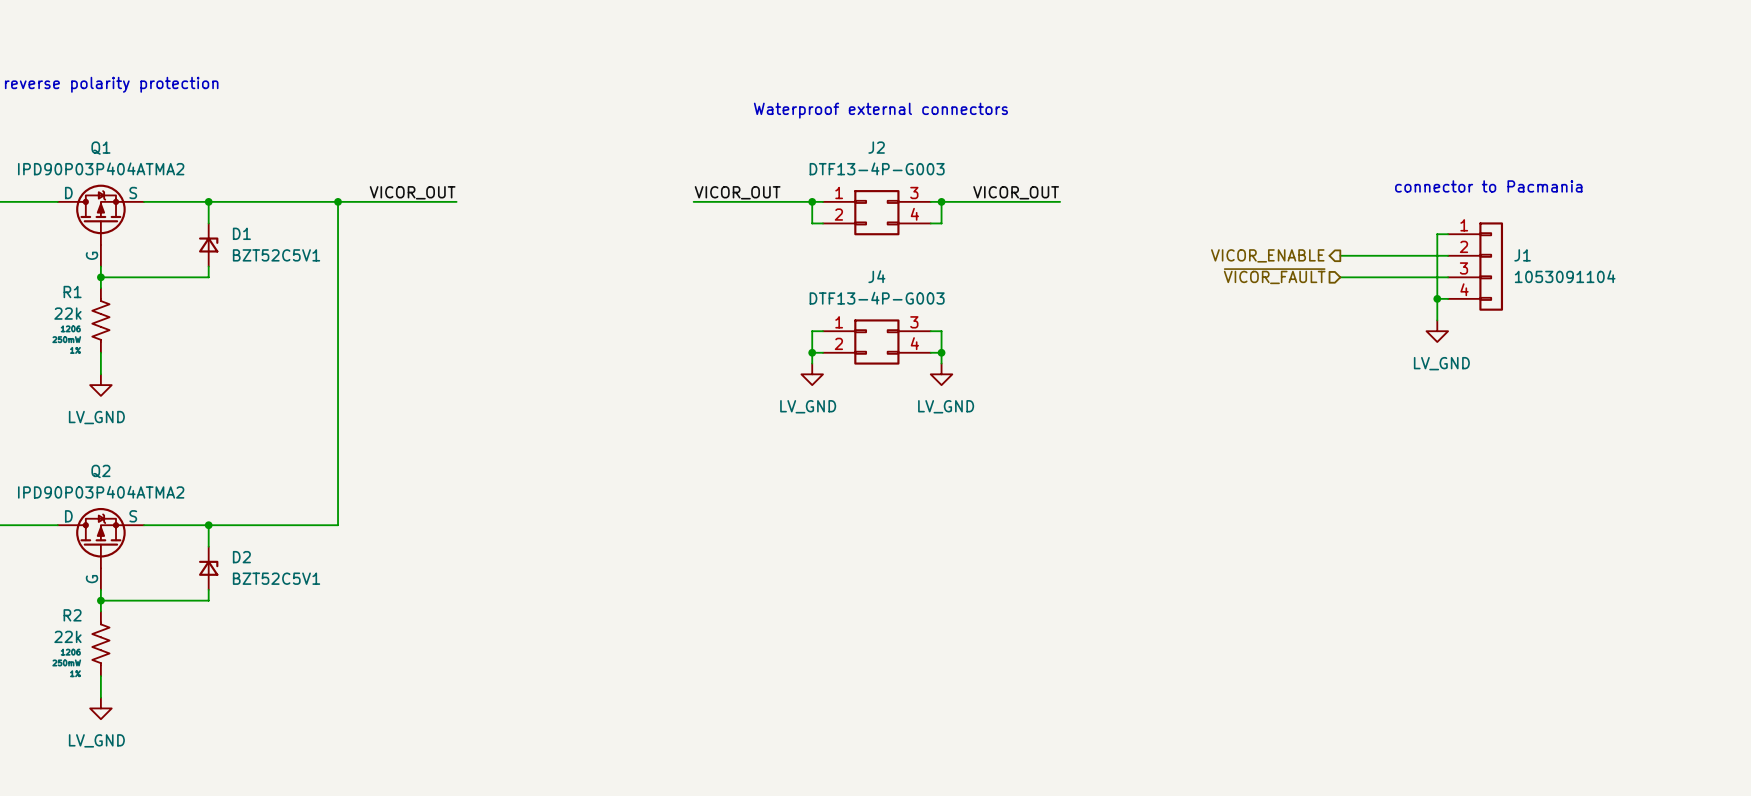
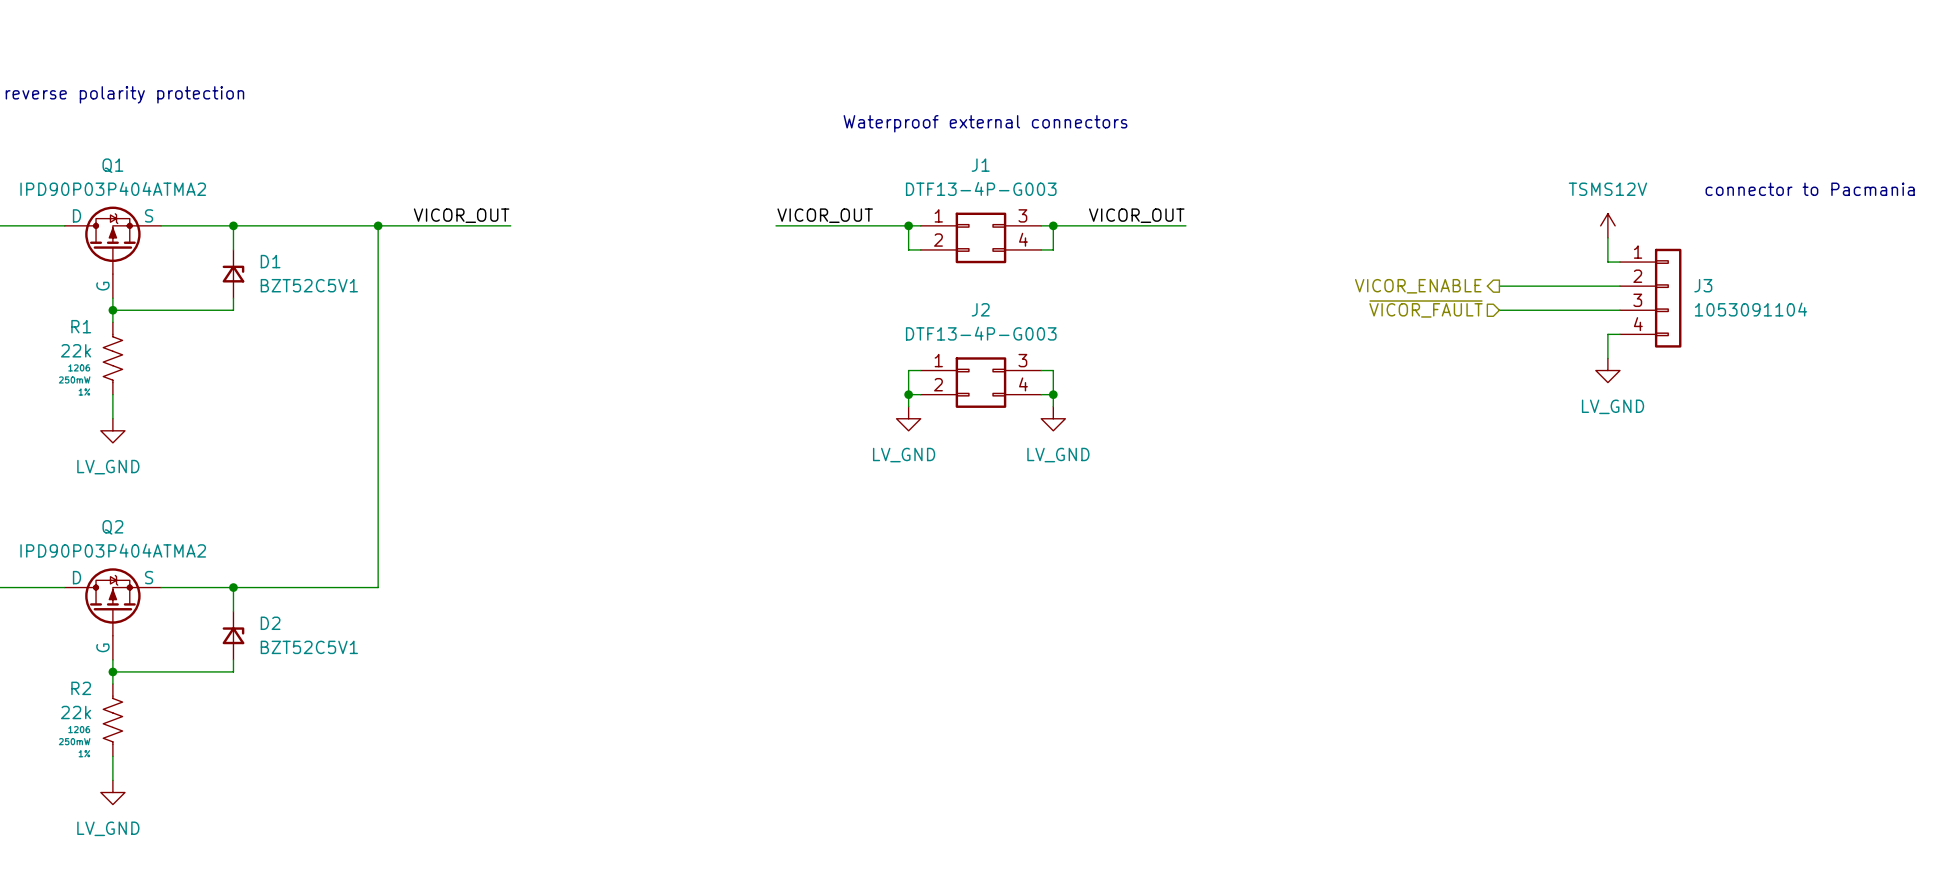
J2 name: J2 (876, 147) -> J1 (980, 165)
text position: connector to Pacmania (1488, 186) -> connector to Pacmania (1810, 189)
power symbol: none -> TSMS12V (1607, 225)
wire: (1437, 234) (1437, 298) -> (1607, 262) (1607, 237)
J1 name: J1 (1522, 255) -> J3 (1703, 285)
J4 name: J4 (876, 276) -> J2 (980, 309)
junction: (1437, 298) -> none

